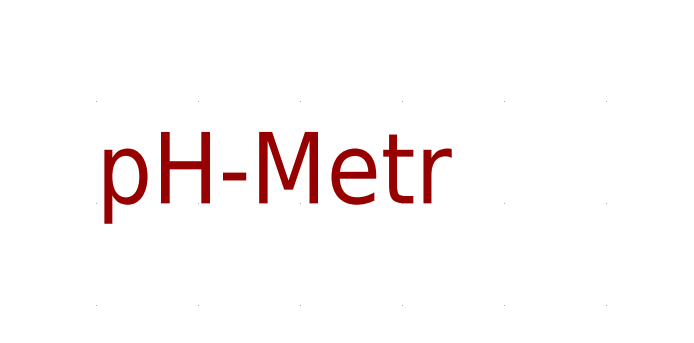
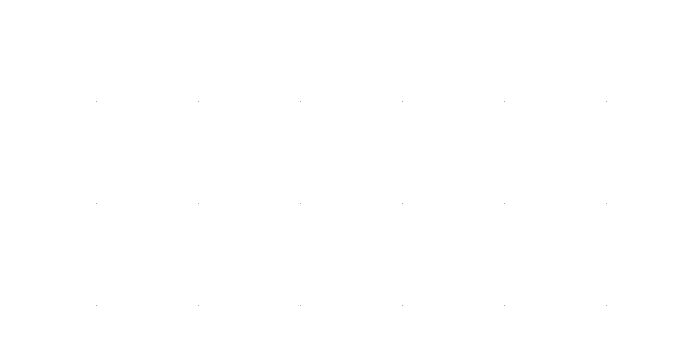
text: pH-Metr (278, 177) -> none

